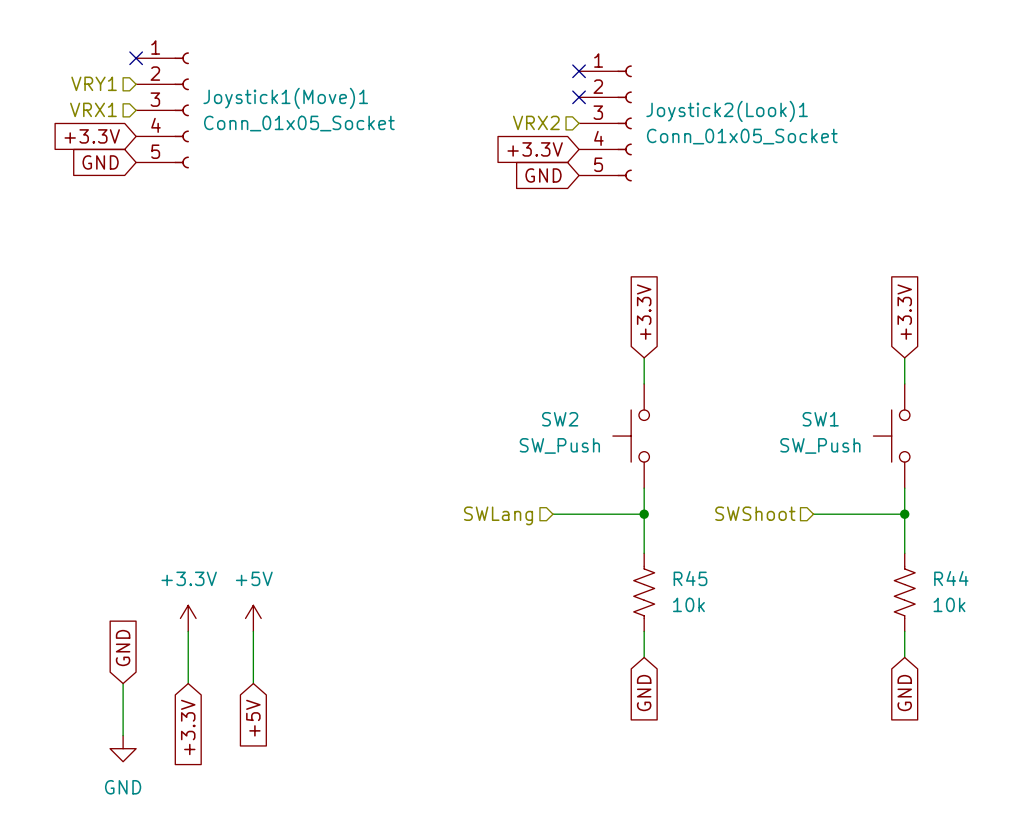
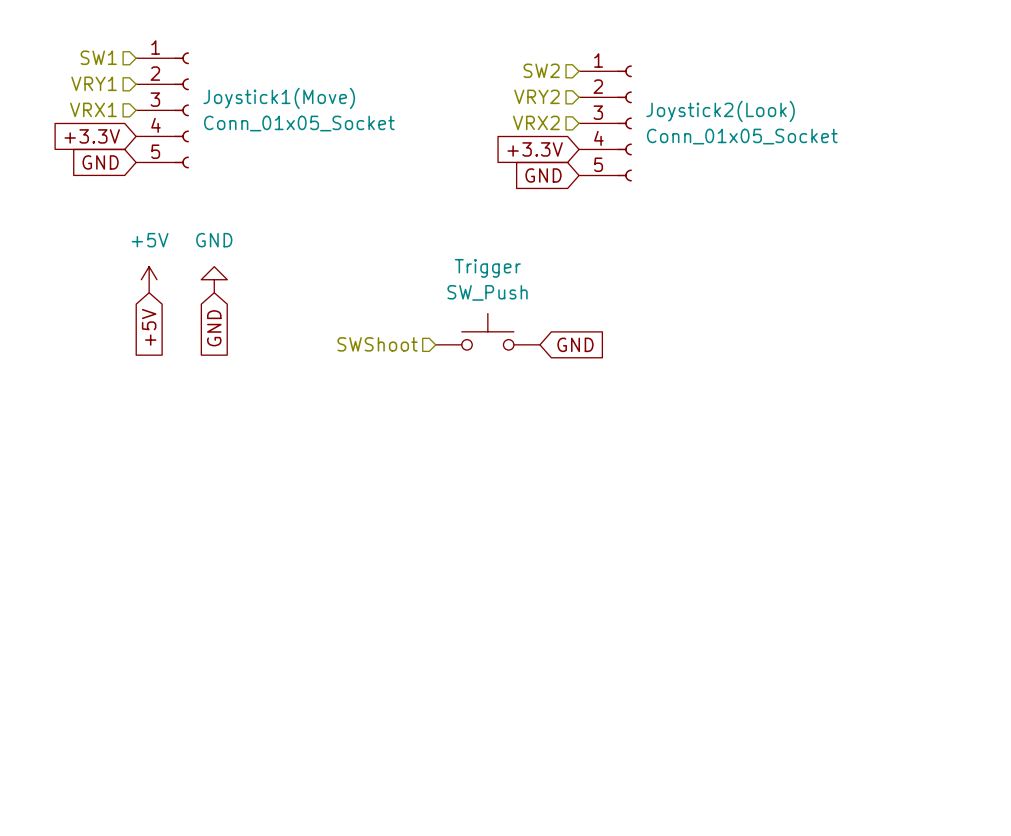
hierarchical label: none -> SW1 (98, 57)
no-connect mark: (136, 58) -> none
hierarchical label: none -> SW2 (541, 70)
no-connect mark: (579, 71) -> none
hierarchical label: none -> VRY2 (536, 96)
no-connect mark: (579, 97) -> none
Joystick1(Move)1 name: Joystick1(Move)1 (285, 98) -> Joystick1(Move) (279, 98)
Joystick2(Look)1 name: Joystick2(Look)1 (727, 111) -> Joystick2(Look) (720, 111)
power symbol: none -> +5V (149, 279)
power symbol: none -> GND (214, 279)
global label: +3.3V (644, 312) -> none
global label: +3.3V (904, 312) -> none
global label: none -> +5V (149, 327)
global label: none -> GND (214, 328)
Trigger: none -> SW_Push (487, 331)
hierarchical label: none -> SWShoot (377, 344)
global label: none -> GND (575, 344)
wire: (644, 357) (644, 383) -> none
wire: (904, 357) (904, 383) -> none
SW2: SW_Push (631, 436) -> none
SW1: SW_Push (891, 436) -> none
wire: (644, 488) (644, 553) -> none
wire: (904, 488) (904, 553) -> none
hierarchical label: SWShoot (755, 513) -> none
wire: (552, 514) (644, 514) -> none
junction: (644, 514) -> none
wire: (813, 514) (904, 514) -> none
junction: (904, 514) -> none
hierarchical label: SWLang (498, 515) -> none
R45: 10k (644, 592) -> none
R44: 10k (904, 592) -> none
power symbol: +3.3V (188, 618) -> none
power symbol: +5V (253, 618) -> none
wire: (188, 631) (188, 683) -> none
wire: (253, 631) (253, 683) -> none
wire: (644, 631) (644, 657) -> none
wire: (904, 631) (904, 657) -> none
global label: GND (123, 648) -> none
wire: (123, 683) (123, 735) -> none
global label: GND (644, 693) -> none
global label: GND (904, 693) -> none
global label: +5V (253, 718) -> none
global label: +3.3V (188, 727) -> none
power symbol: GND (123, 748) -> none

